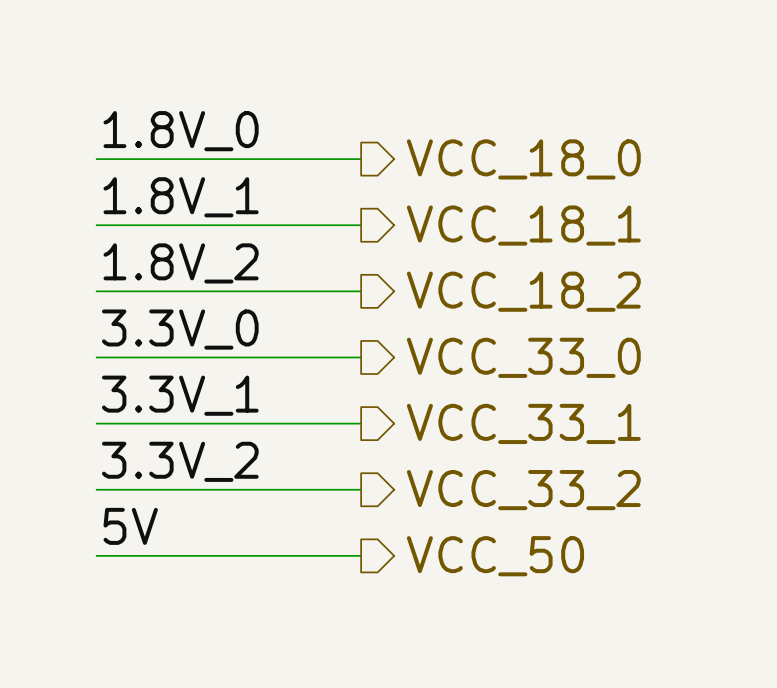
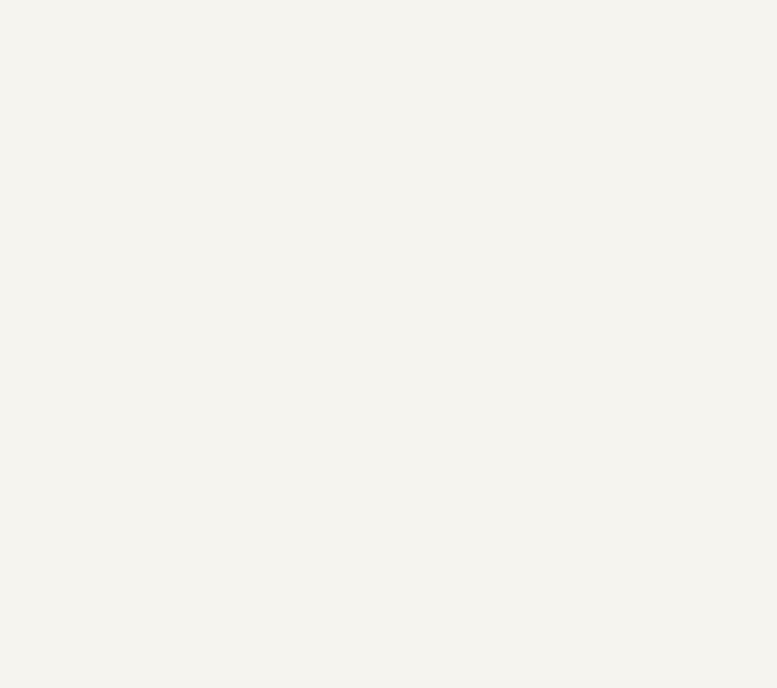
label: 1.8V_0 (181, 131) -> none
wire: (96, 159) (361, 159) -> none
hierarchical label: VCC_18_0 (523, 159) -> none
label: 1.8V_1 (181, 197) -> none
wire: (96, 225) (361, 225) -> none
hierarchical label: VCC_18_1 (523, 225) -> none
label: 1.8V_2 (181, 263) -> none
wire: (96, 291) (361, 291) -> none
hierarchical label: VCC_18_2 (523, 291) -> none
label: 3.3V_0 (180, 329) -> none
wire: (96, 357) (361, 357) -> none
hierarchical label: VCC_33_0 (523, 357) -> none
label: 3.3V_1 (180, 395) -> none
wire: (96, 423) (361, 423) -> none
hierarchical label: VCC_33_1 (523, 423) -> none
label: 3.3V_2 (180, 461) -> none
wire: (96, 489) (361, 489) -> none
hierarchical label: VCC_33_2 (523, 490) -> none
label: 5V (130, 526) -> none
wire: (96, 555) (361, 555) -> none
hierarchical label: VCC_50 (495, 556) -> none

